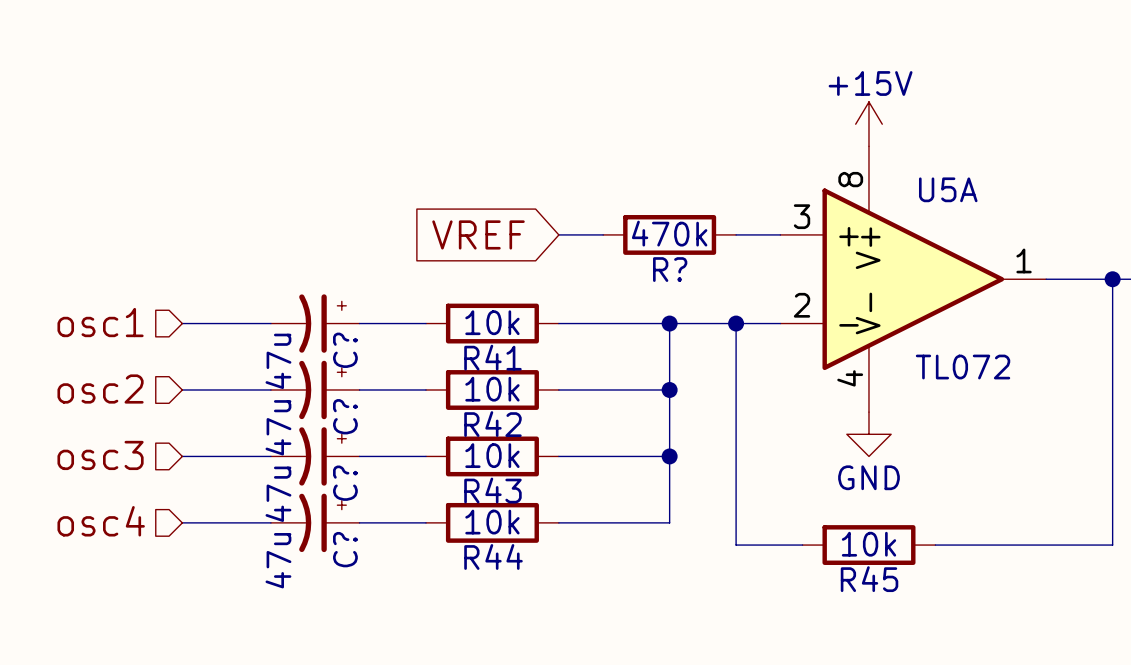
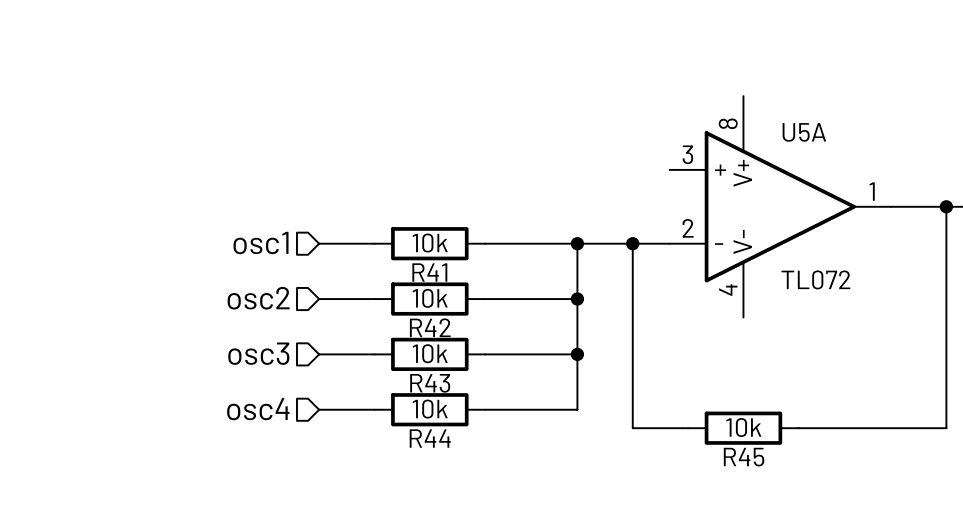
power symbol: +15V (868, 124) -> none
global label: VREF (478, 234) -> none
wire: (558, 234) (603, 234) -> none
R?: 470k (669, 234) -> none
wire: (736, 234) (780, 234) -> none
hierarchical label position: osc1 (100, 322) -> osc1 (261, 243)
wire: (182, 323) (270, 323) -> none
C?: 47u (315, 323) -> none
hierarchical label position: osc2 (100, 389) -> osc2 (258, 298)
wire: (182, 389) (270, 389) -> none
C?: 47u (315, 389) -> none
power symbol: GND (868, 434) -> none
hierarchical label position: osc3 (100, 455) -> osc3 (258, 353)
wire: (182, 456) (270, 456) -> none
C?: 47u (315, 456) -> none
hierarchical label position: osc4 (101, 521) -> osc4 (258, 409)
wire: (182, 522) (270, 522) -> none
C?: 47u (315, 522) -> none

